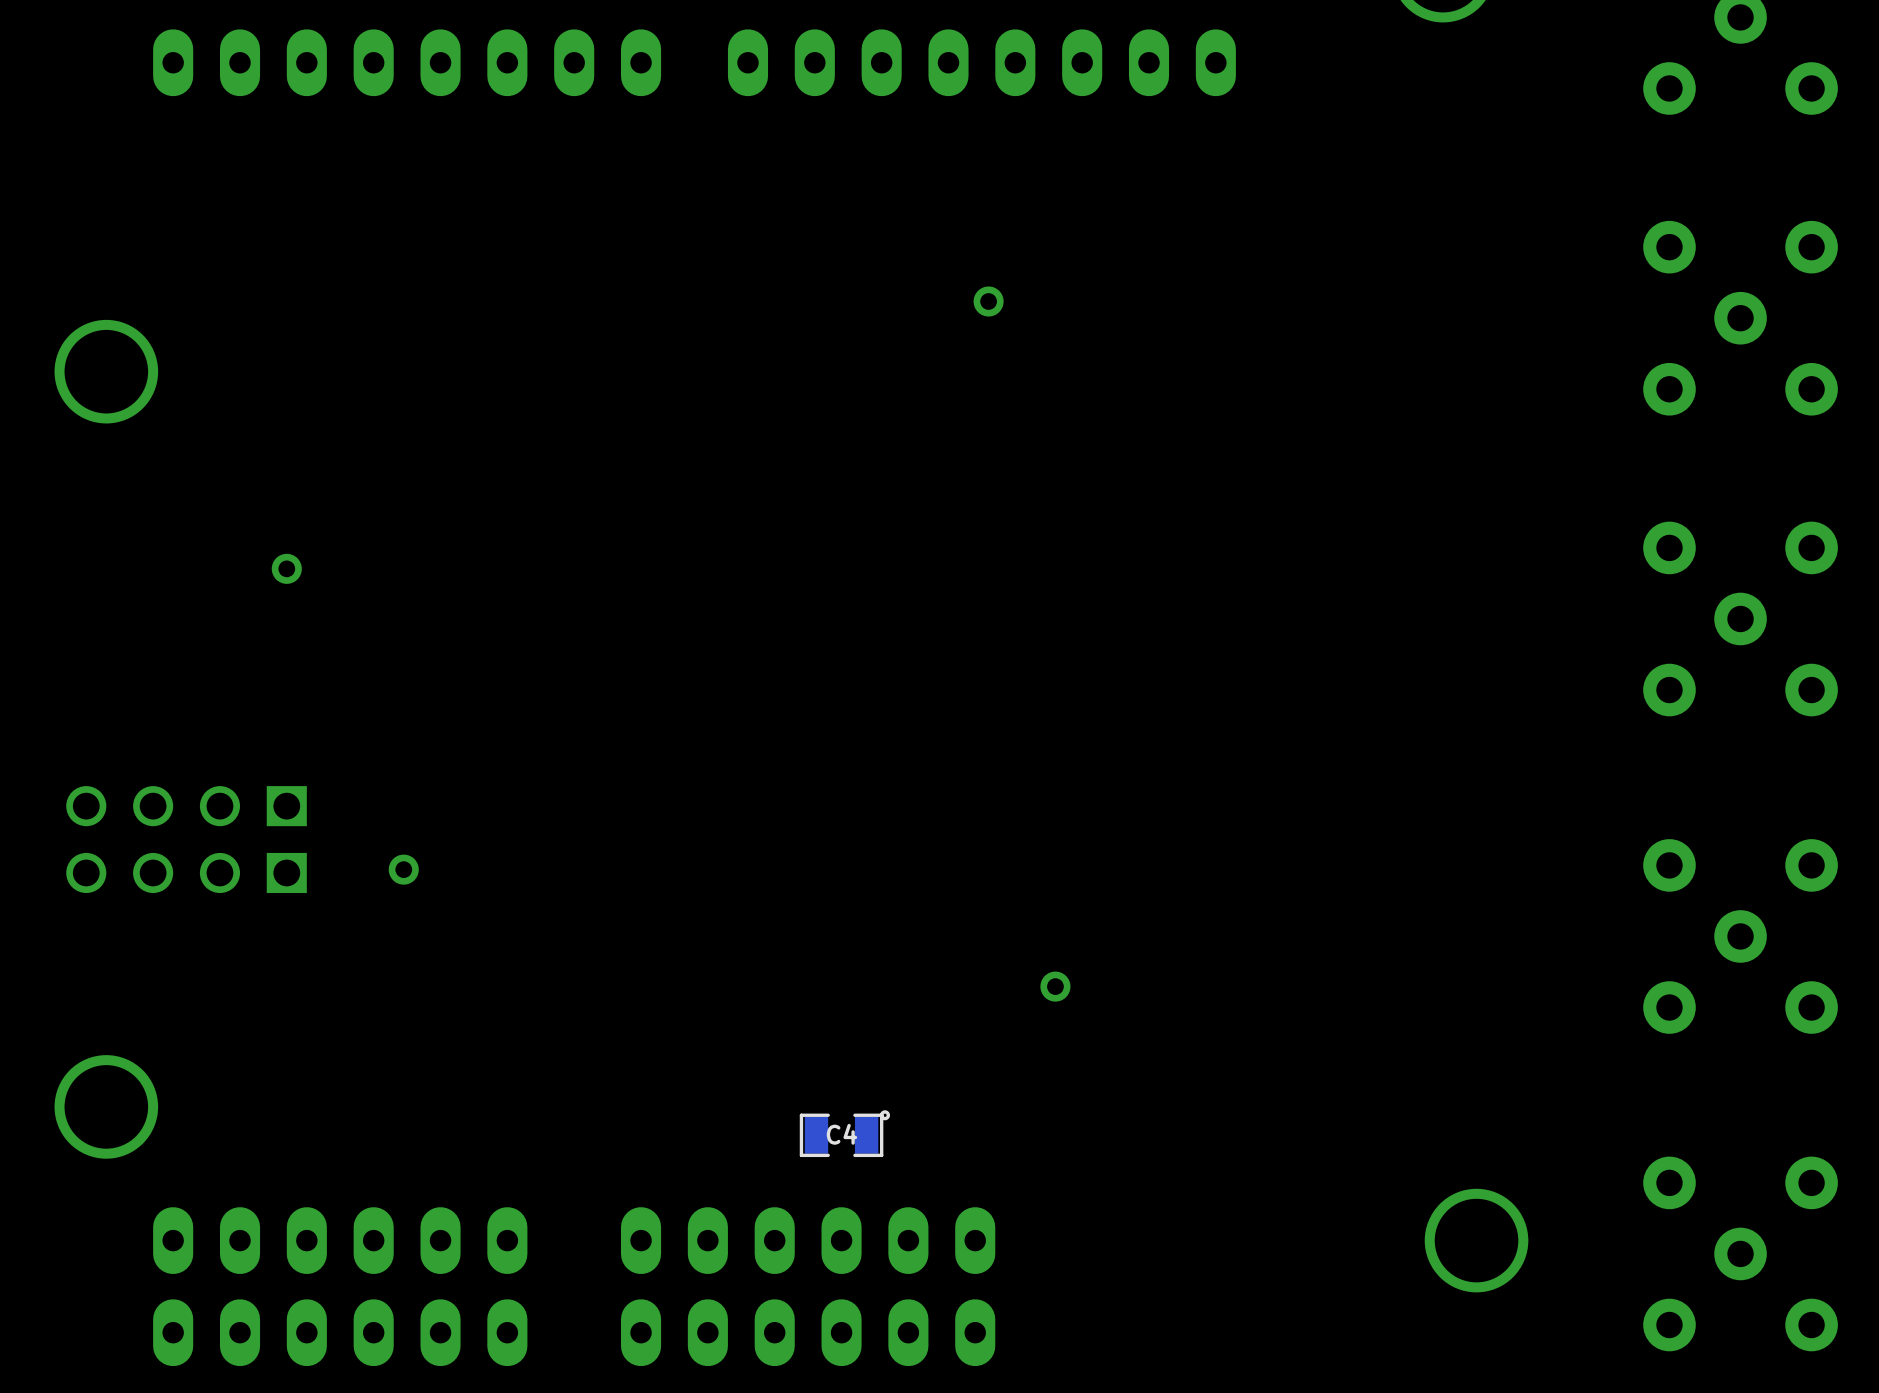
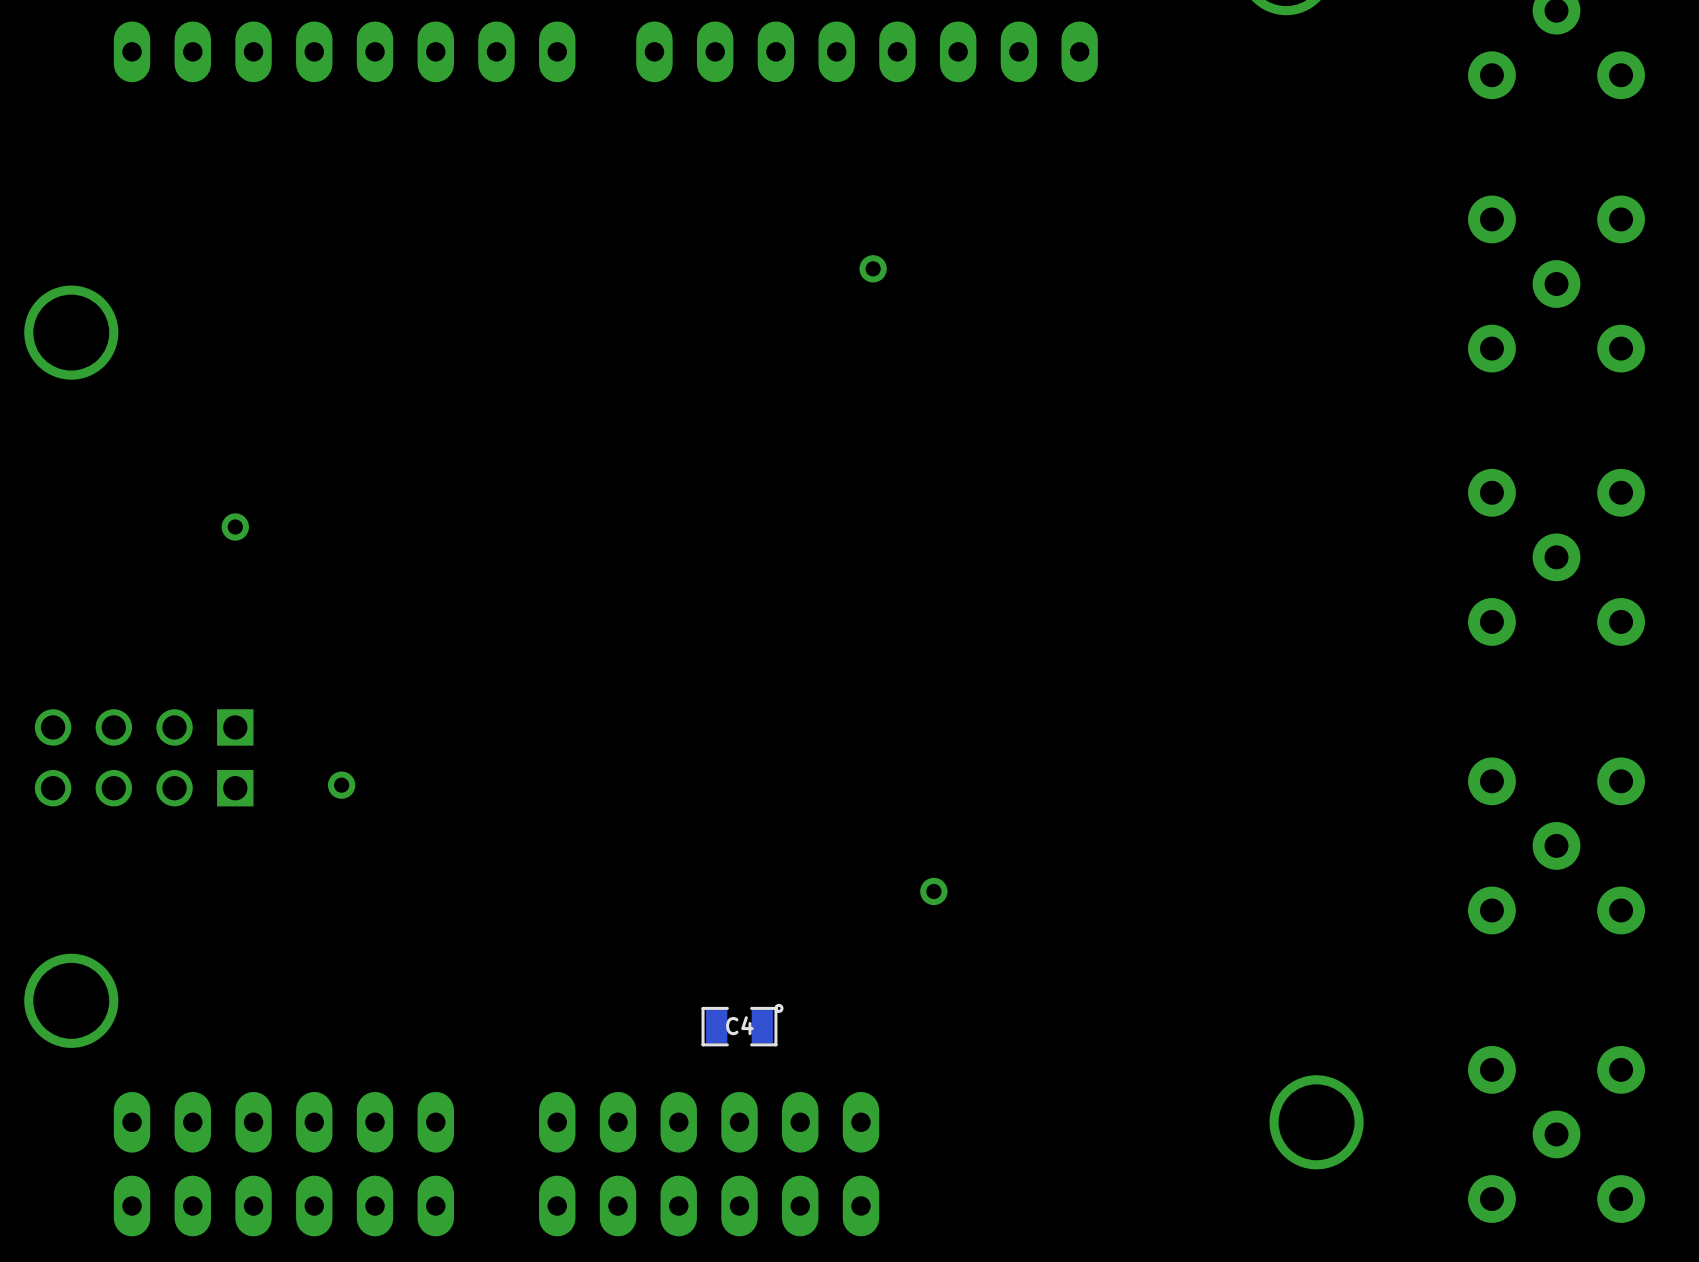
part position: (286, 568) -> (235, 526)

